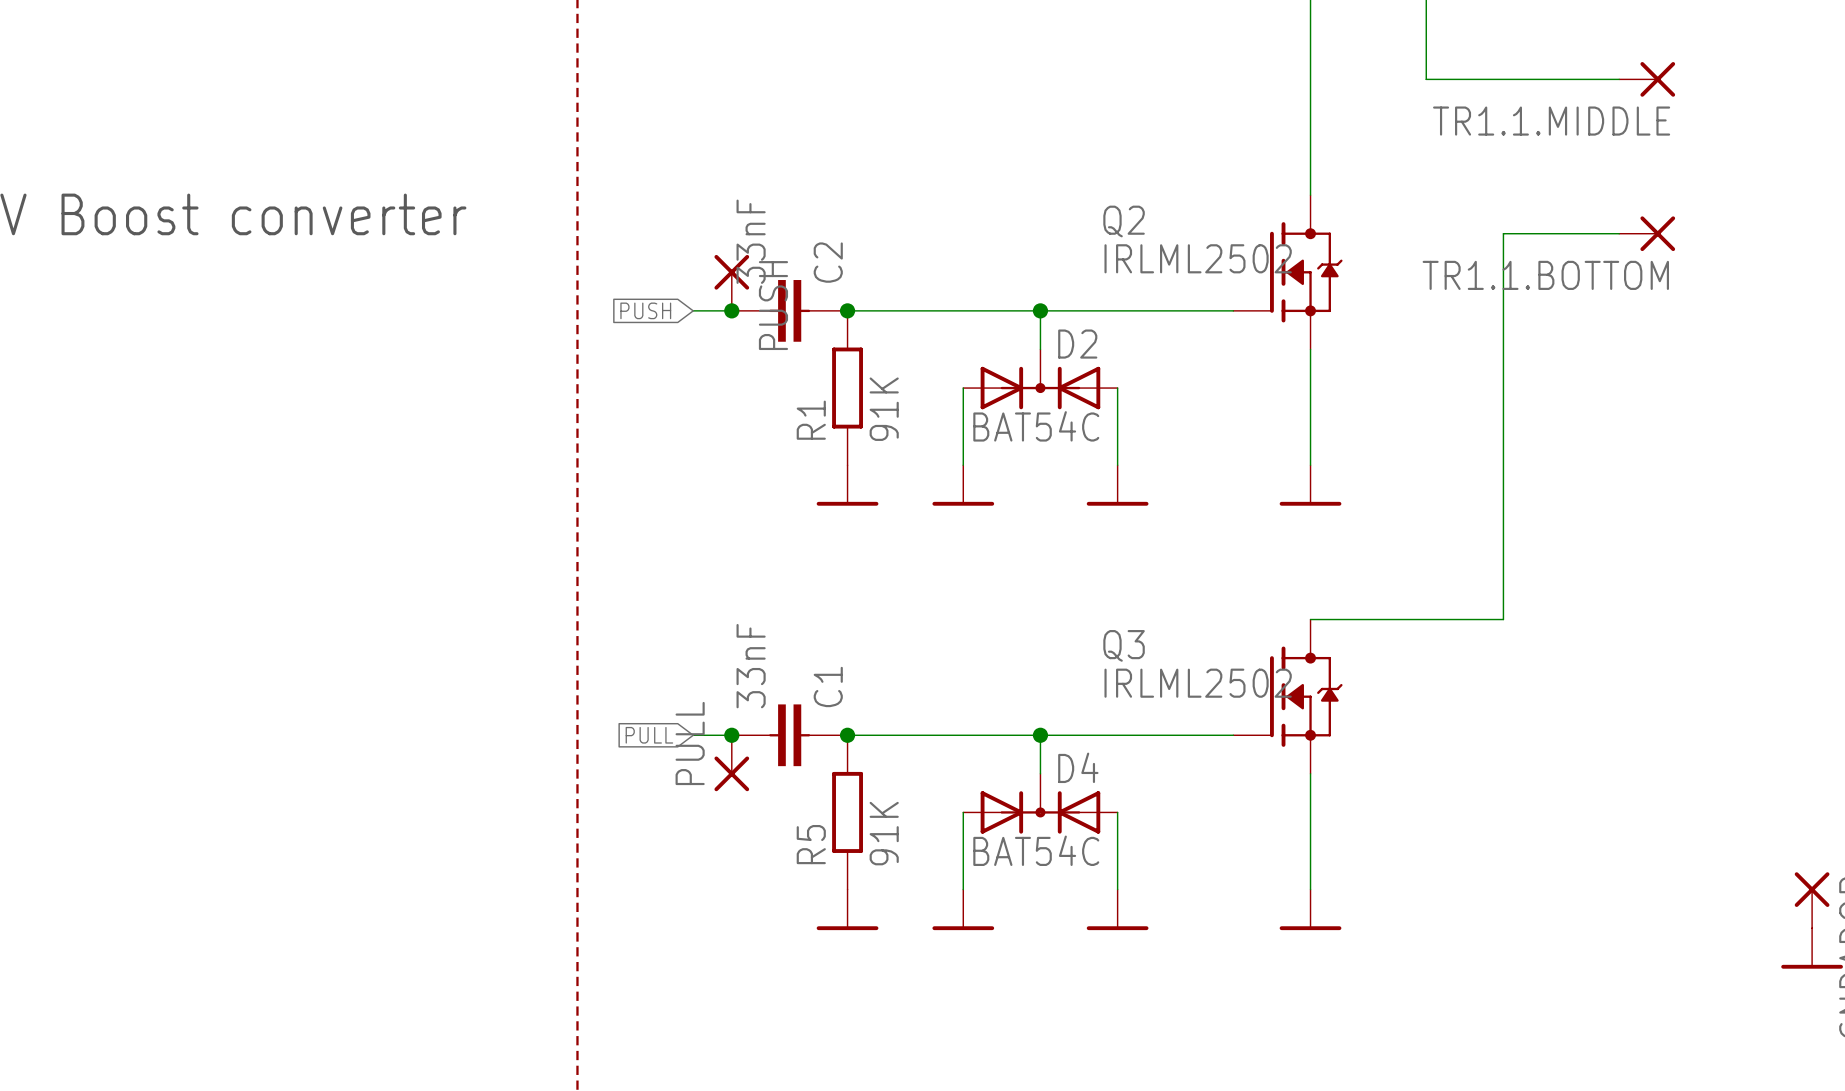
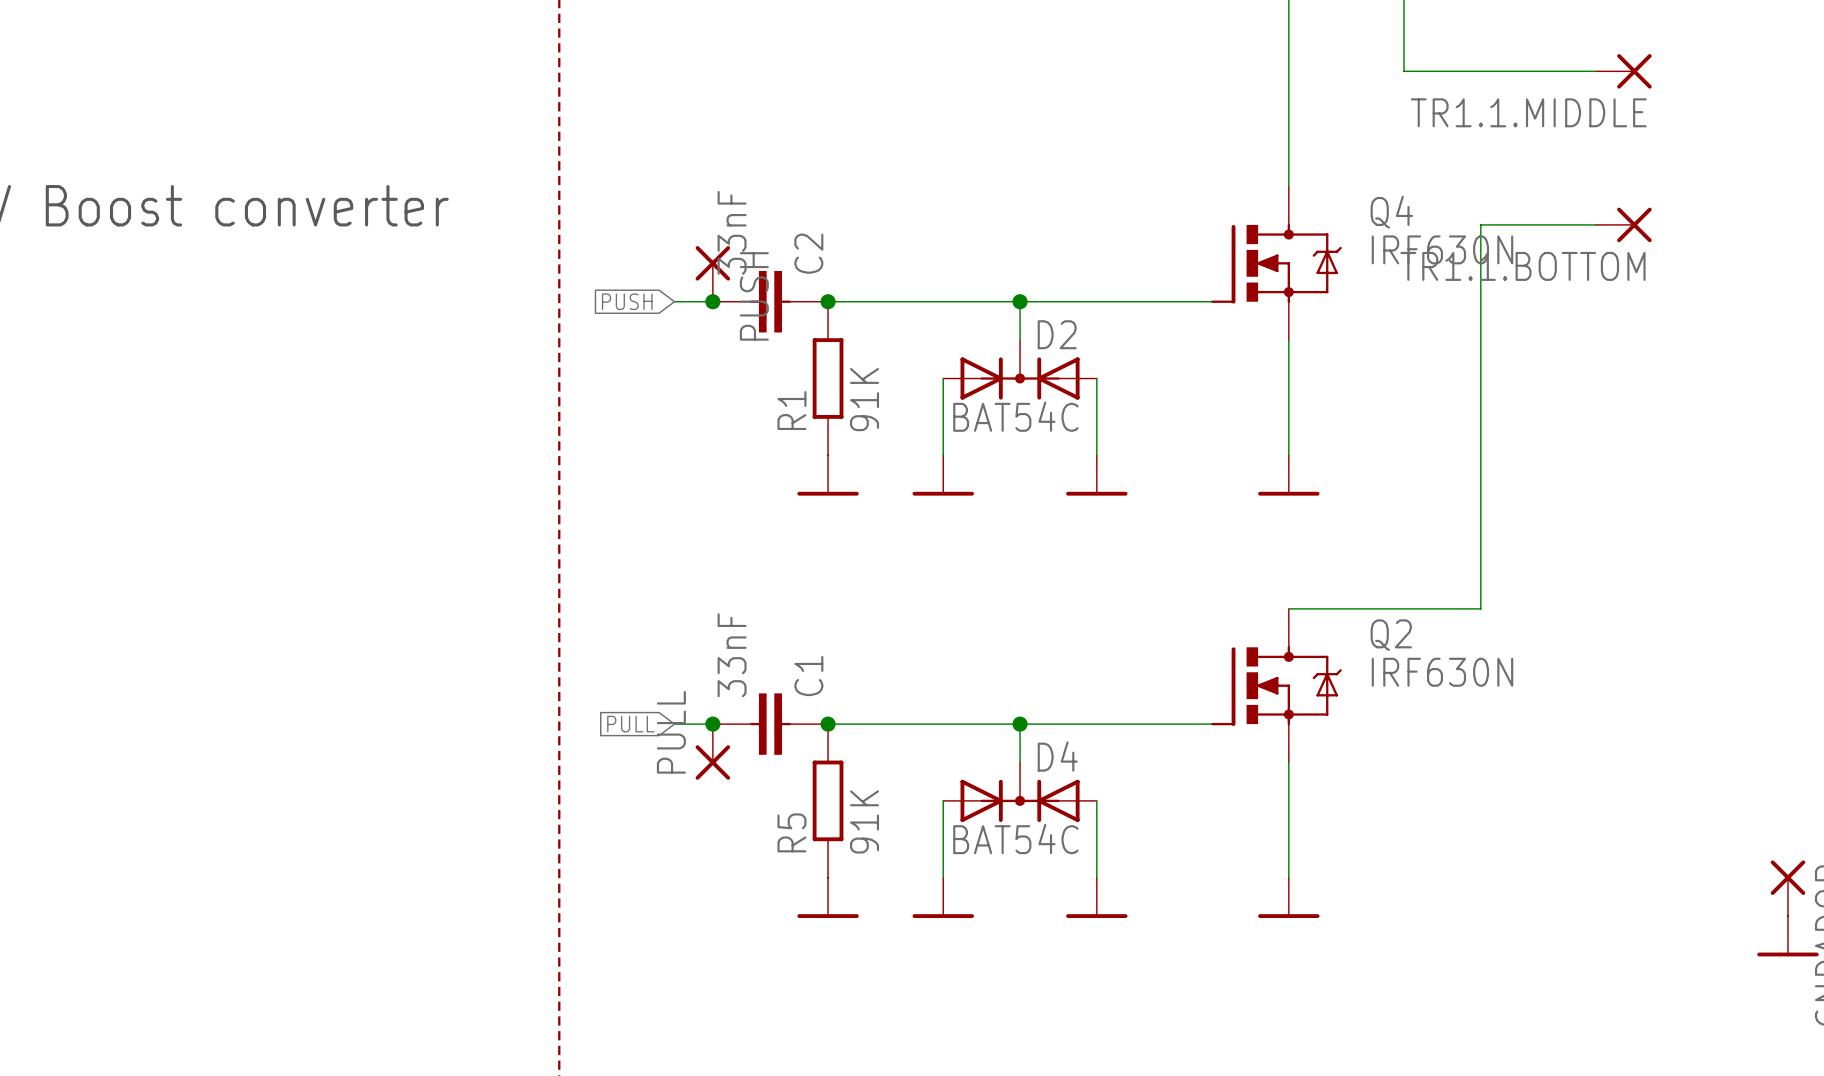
Q2 symbol: [1233, 195, 1343, 350] -> [1210, 608, 1342, 763]
Q2 name position: Q2 (1124, 221) -> Q2 (1391, 635)
Q2 value: IRLML2502 (1198, 258) -> IRF630N (1442, 672)
Q4: none -> IRF630N (1276, 263)
Q3: IRLML2502 (1287, 696) -> none

